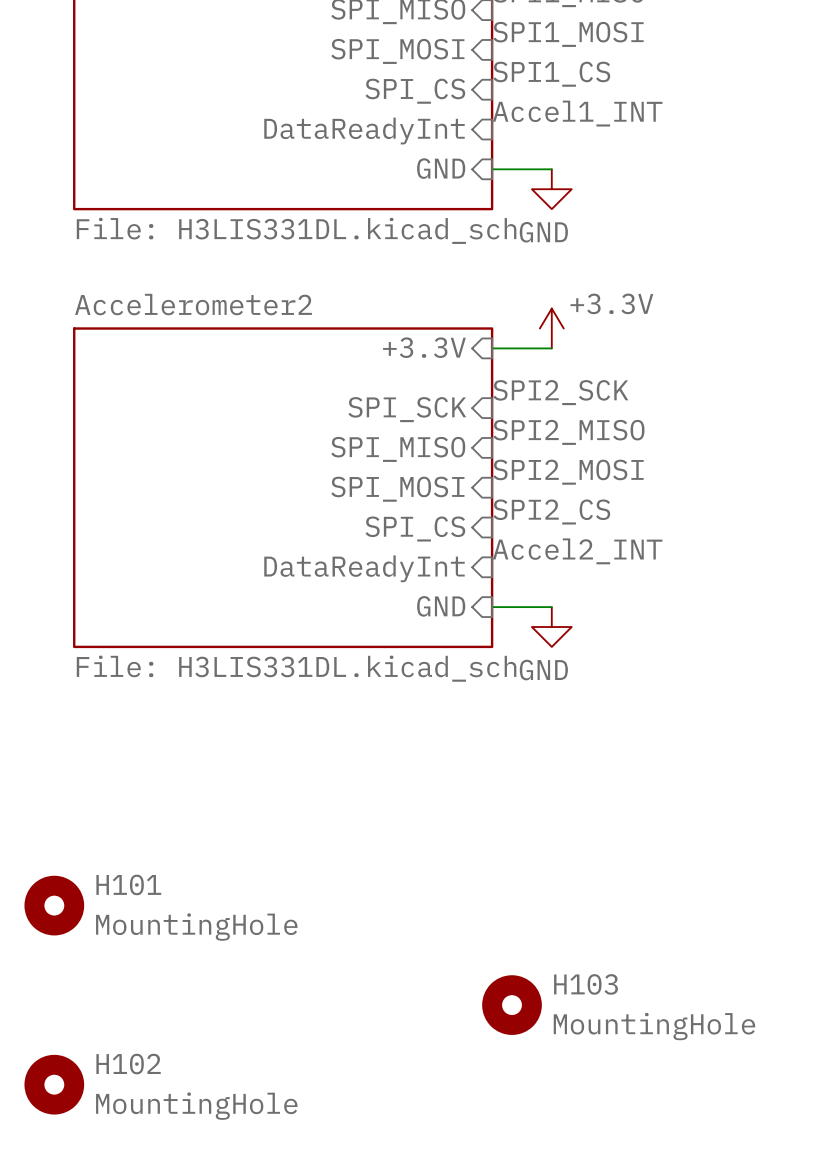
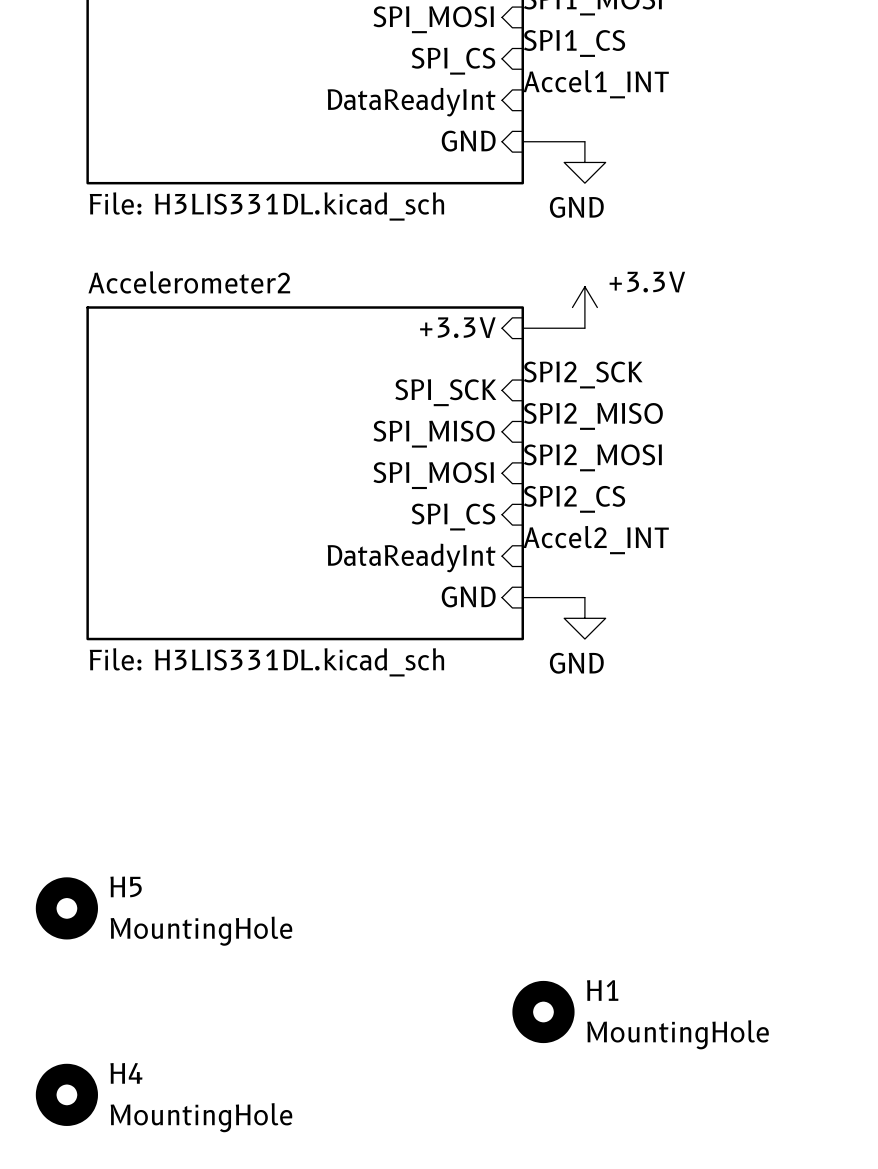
H101 name: H101 (128, 884) -> H5 (126, 886)
H103 name: H103 (585, 984) -> H1 (602, 990)
H102 name: H102 (128, 1064) -> H4 (126, 1073)

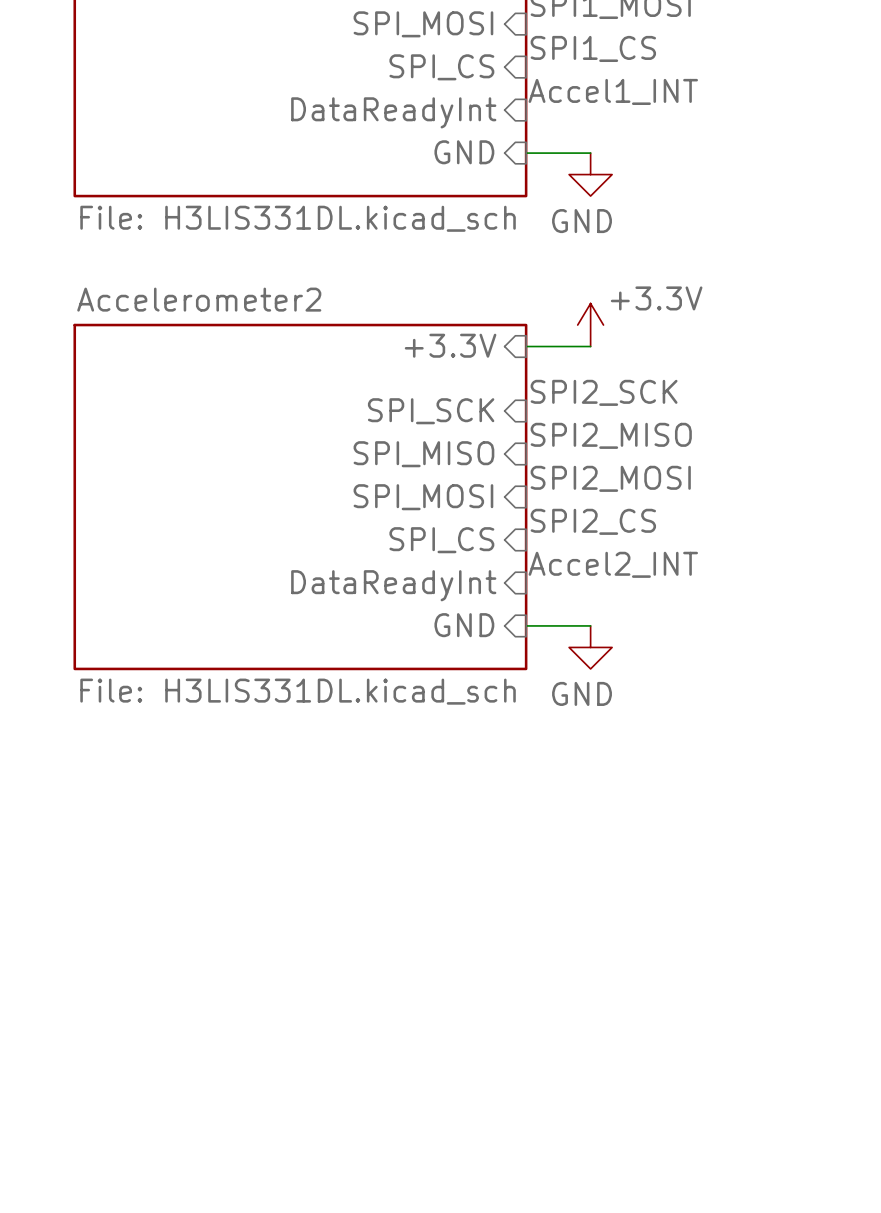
H5: MountingHole (66, 908) -> none
H1: MountingHole (543, 1012) -> none
H4: MountingHole (66, 1094) -> none

